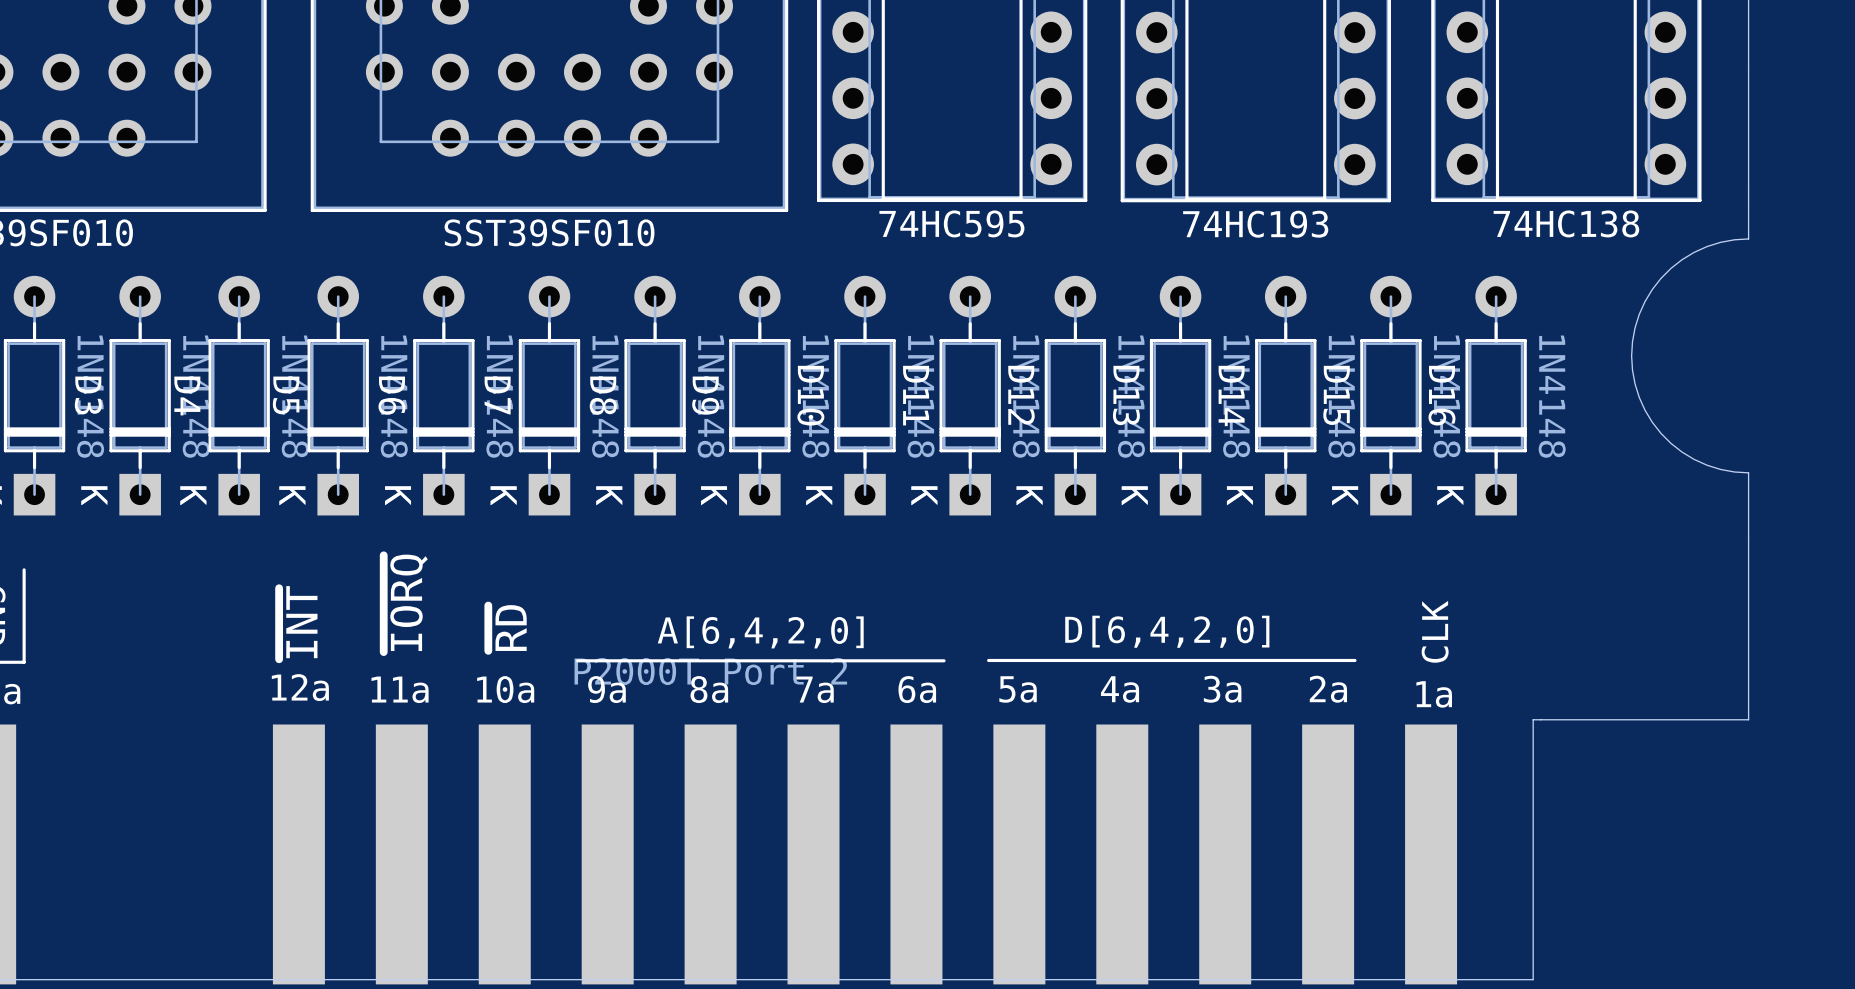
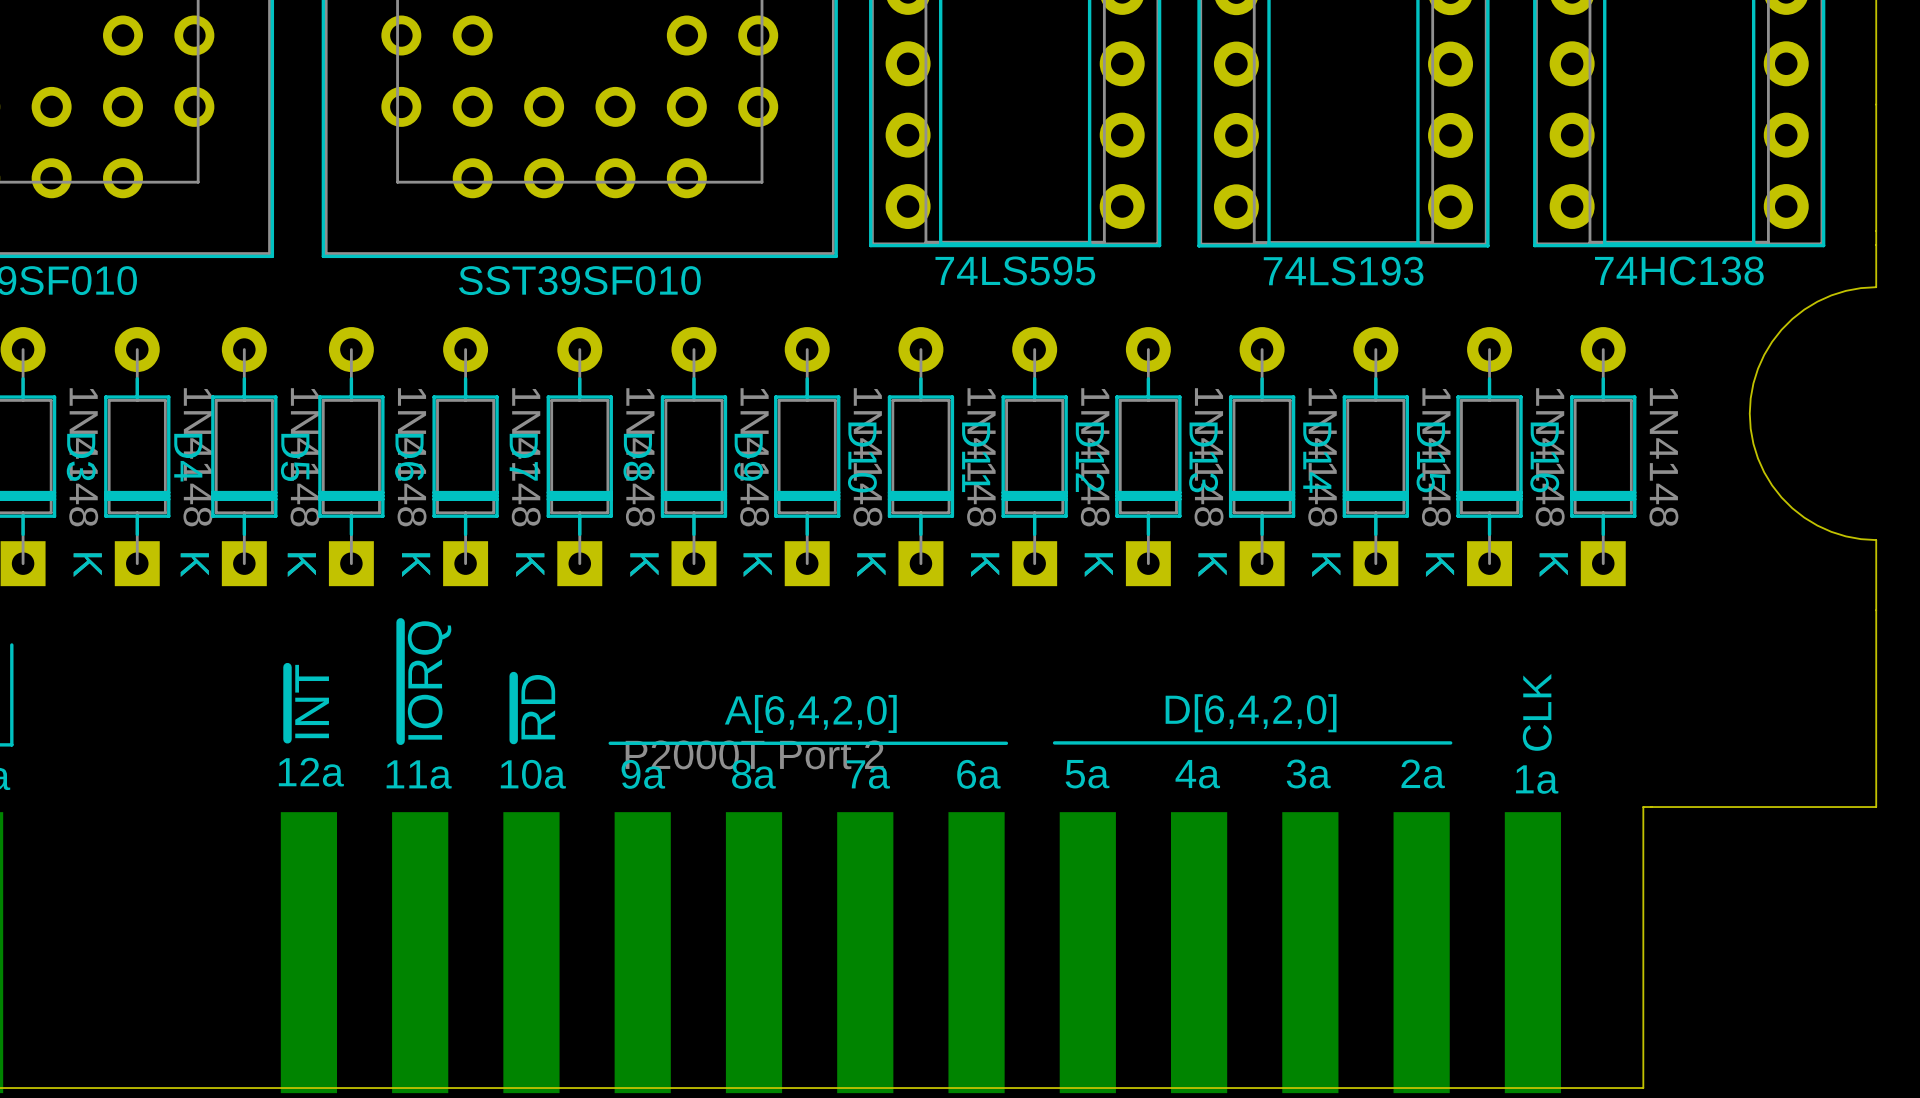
part value: 74HC595 (951, 223) -> 74LS595 (1015, 270)
part value: 74HC193 (1255, 224) -> 74LS193 (1343, 271)

